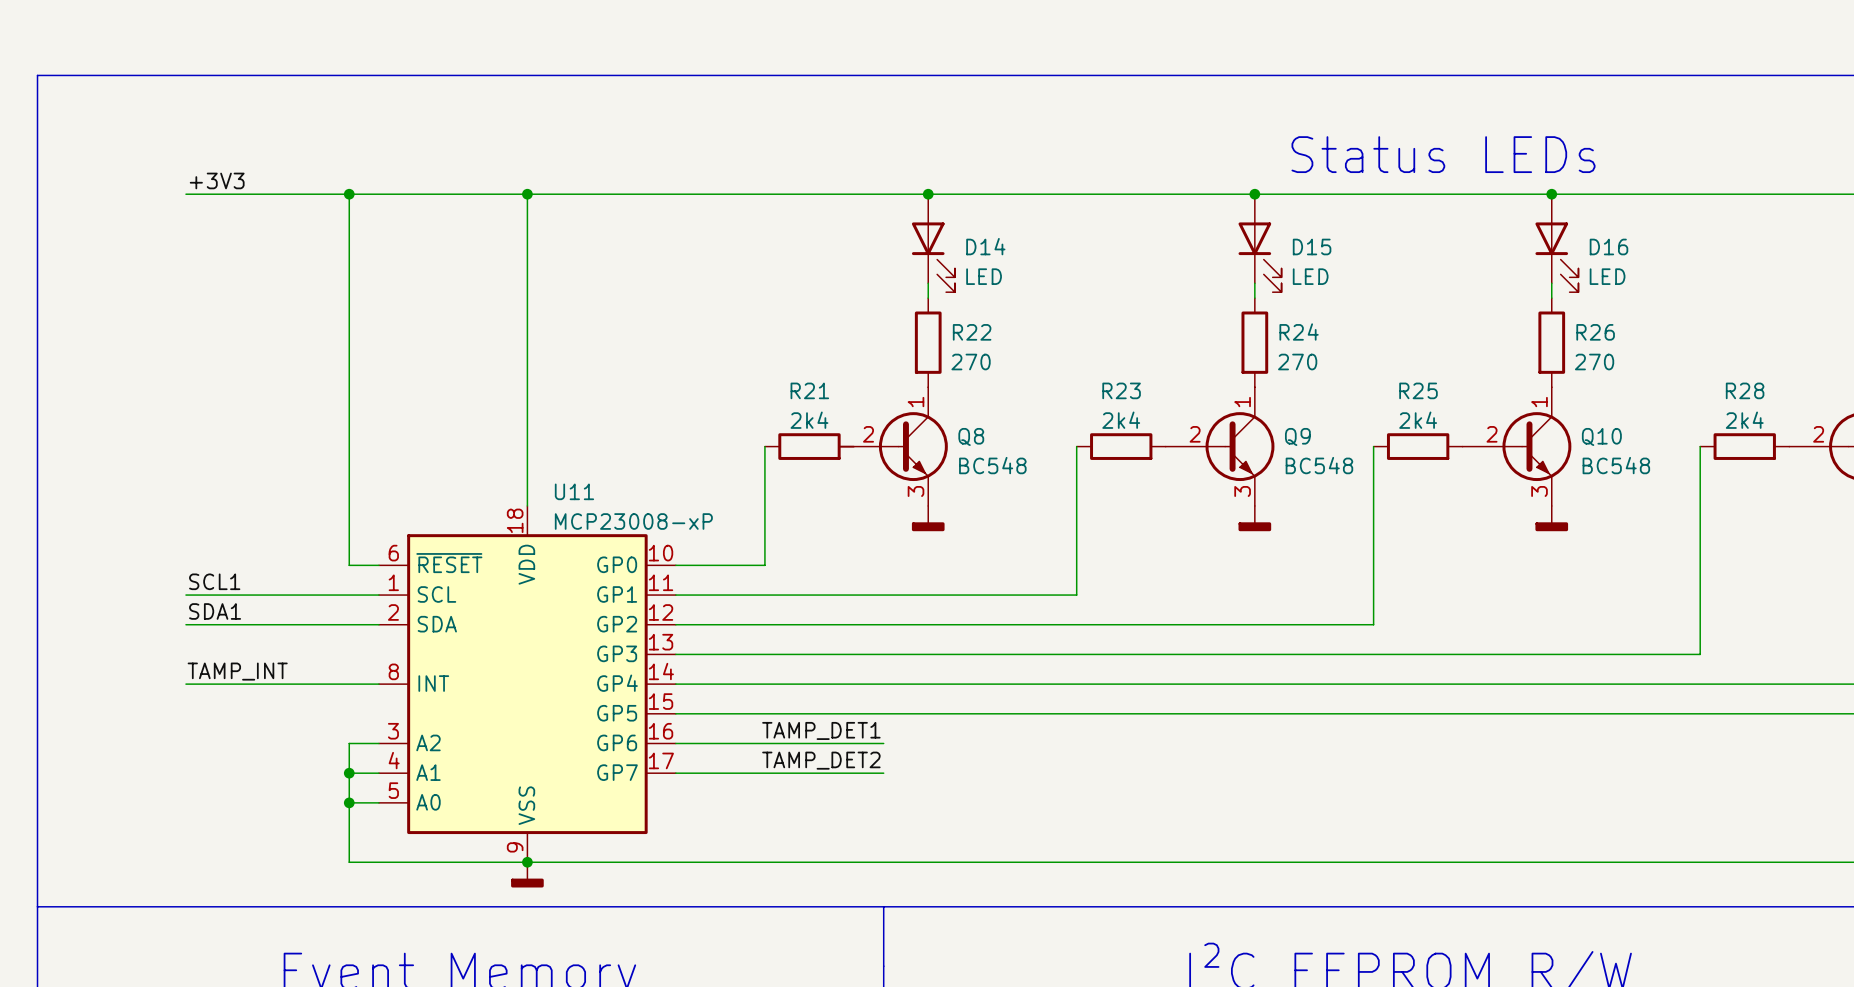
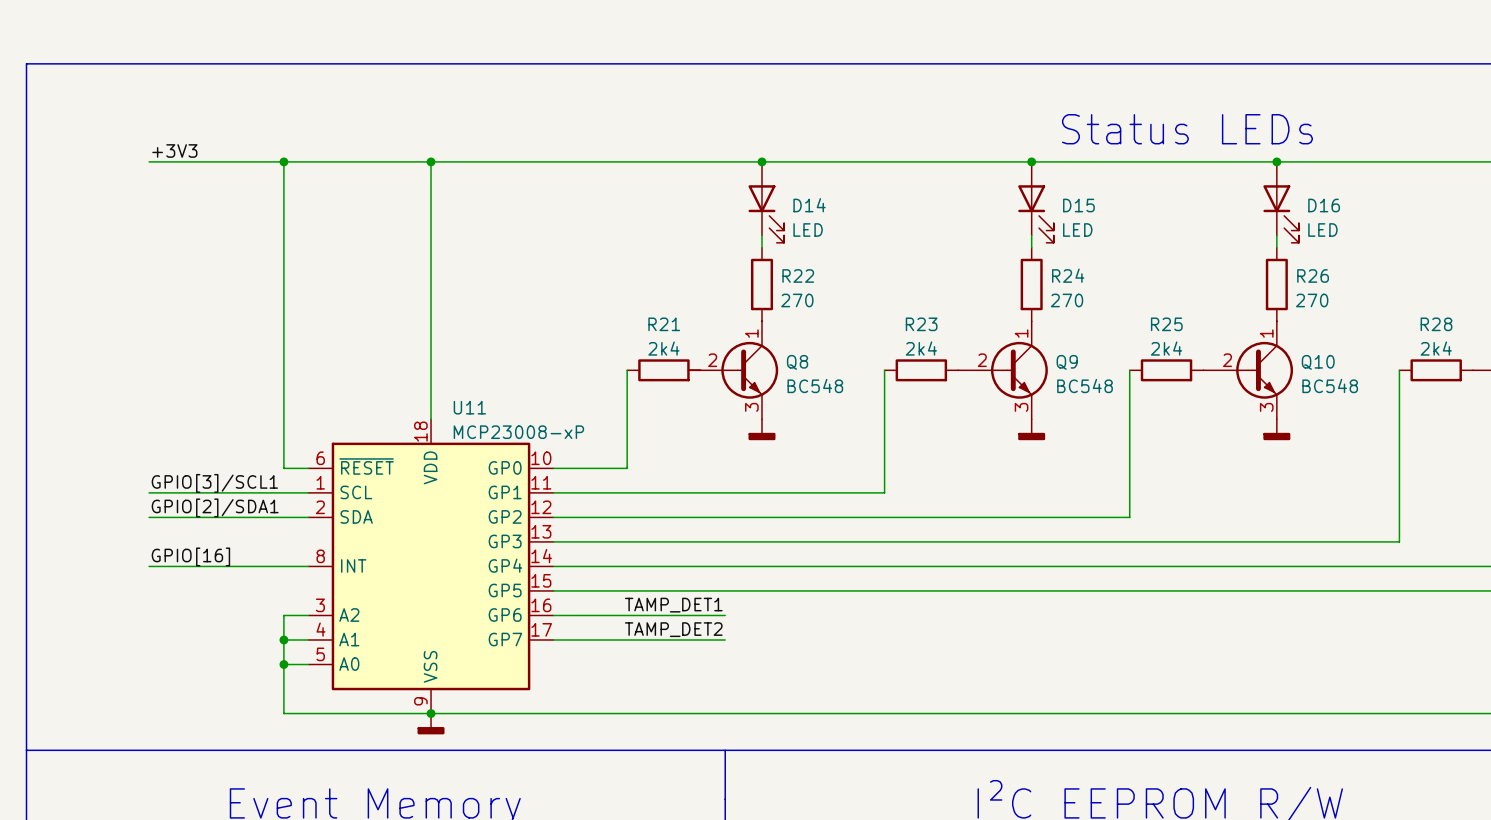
label: SCL1 (214, 581) -> GPIO[3]/SCL1 (214, 483)
label: SDA1 (215, 611) -> GPIO[2]/SDA1 (215, 507)
label: TAMP_INT (237, 671) -> GPIO[16] (190, 556)

